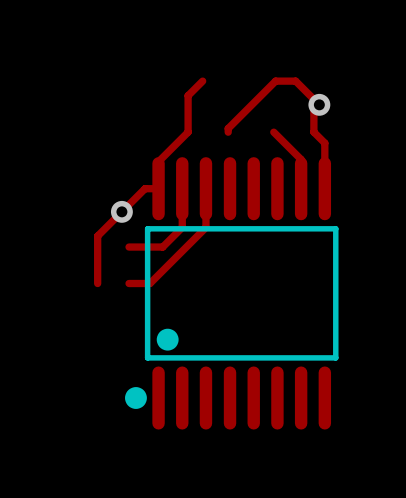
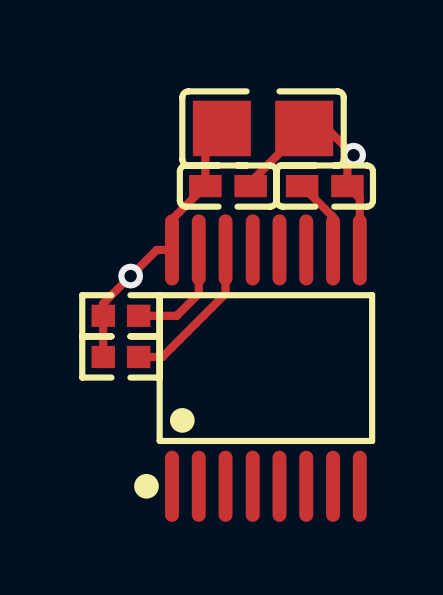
part: none -> (263, 128)
part: none -> (228, 186)
part: none -> (324, 186)
part: none -> (120, 315)
part: none -> (120, 356)

